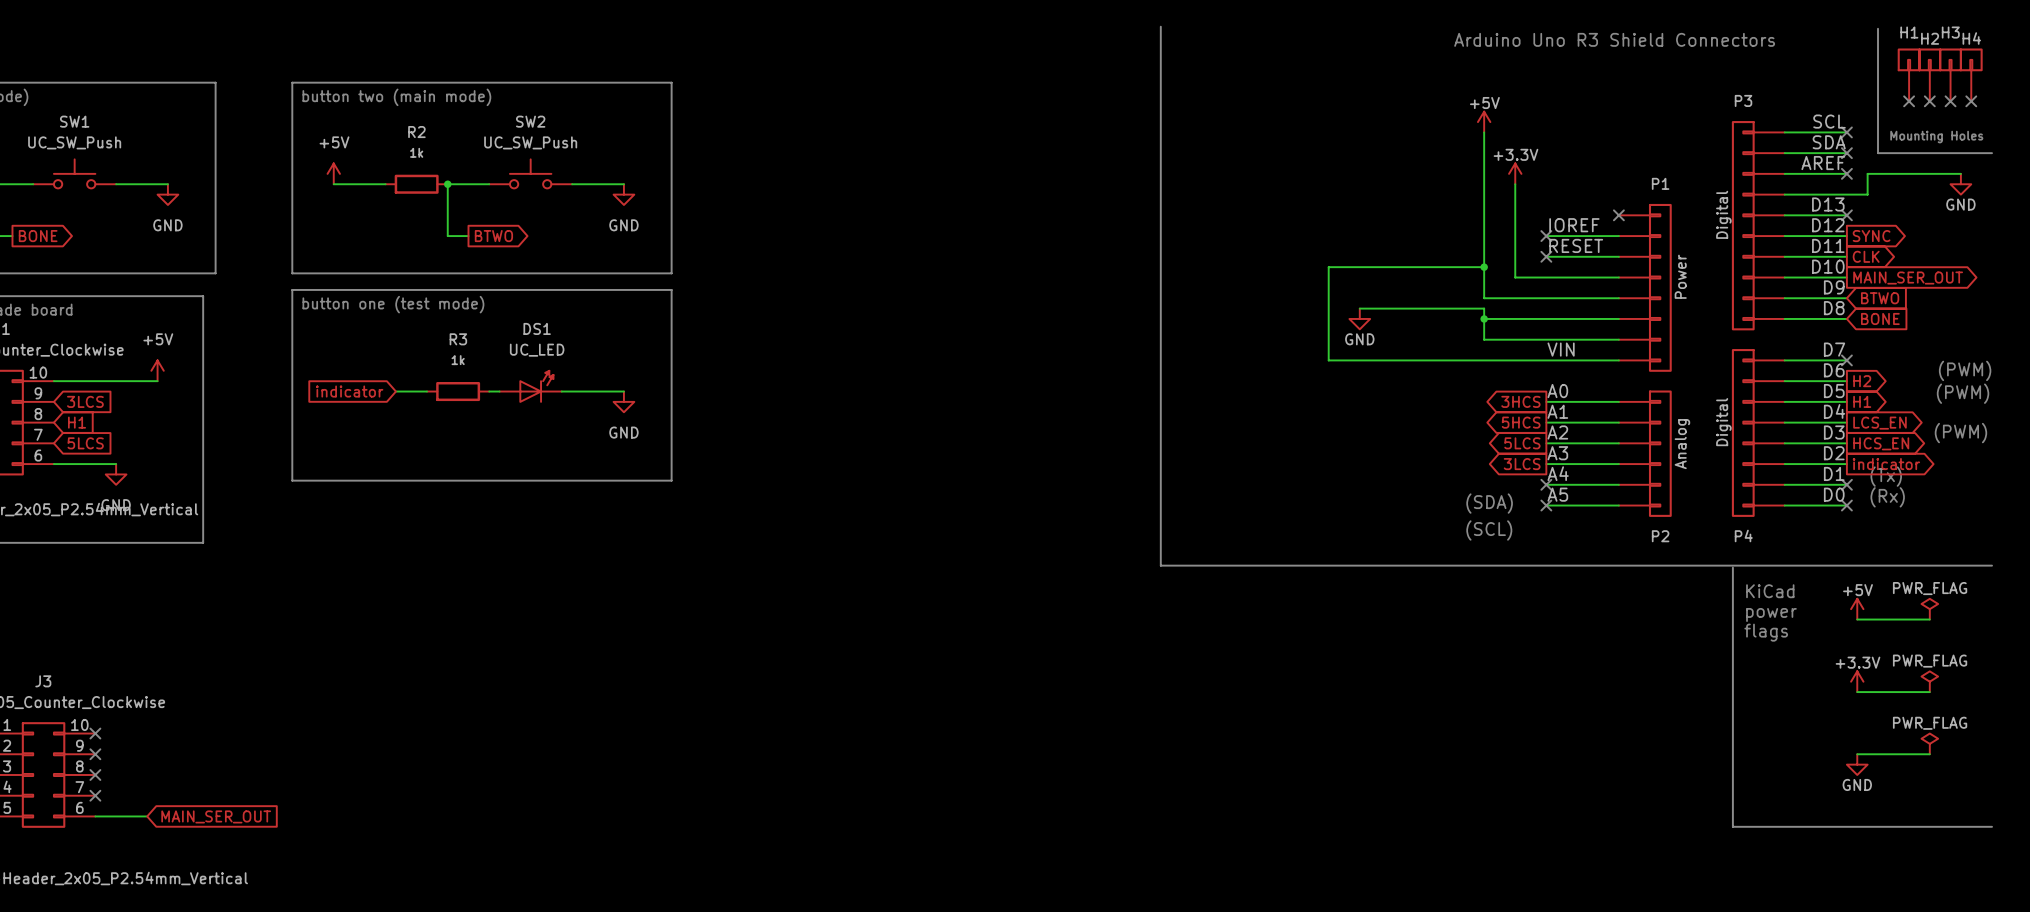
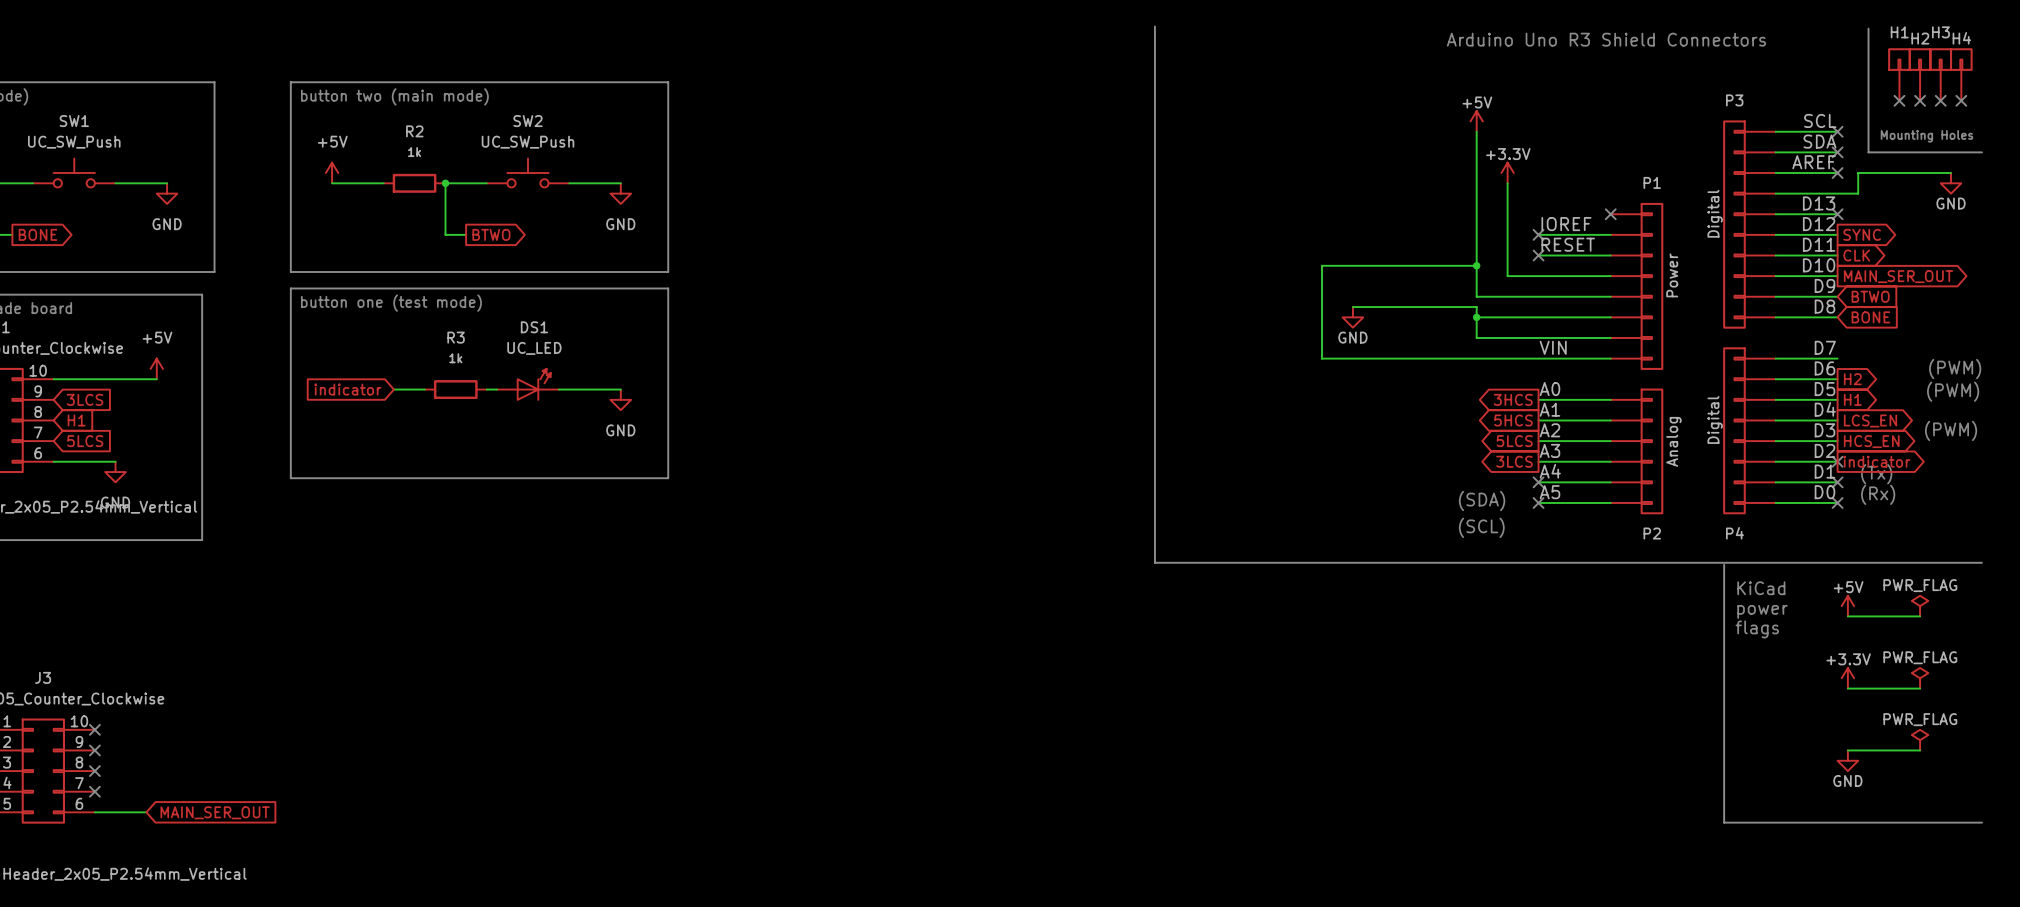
no-connect mark: (1846, 360) -> none
no-connect mark: none -> (1837, 461)

